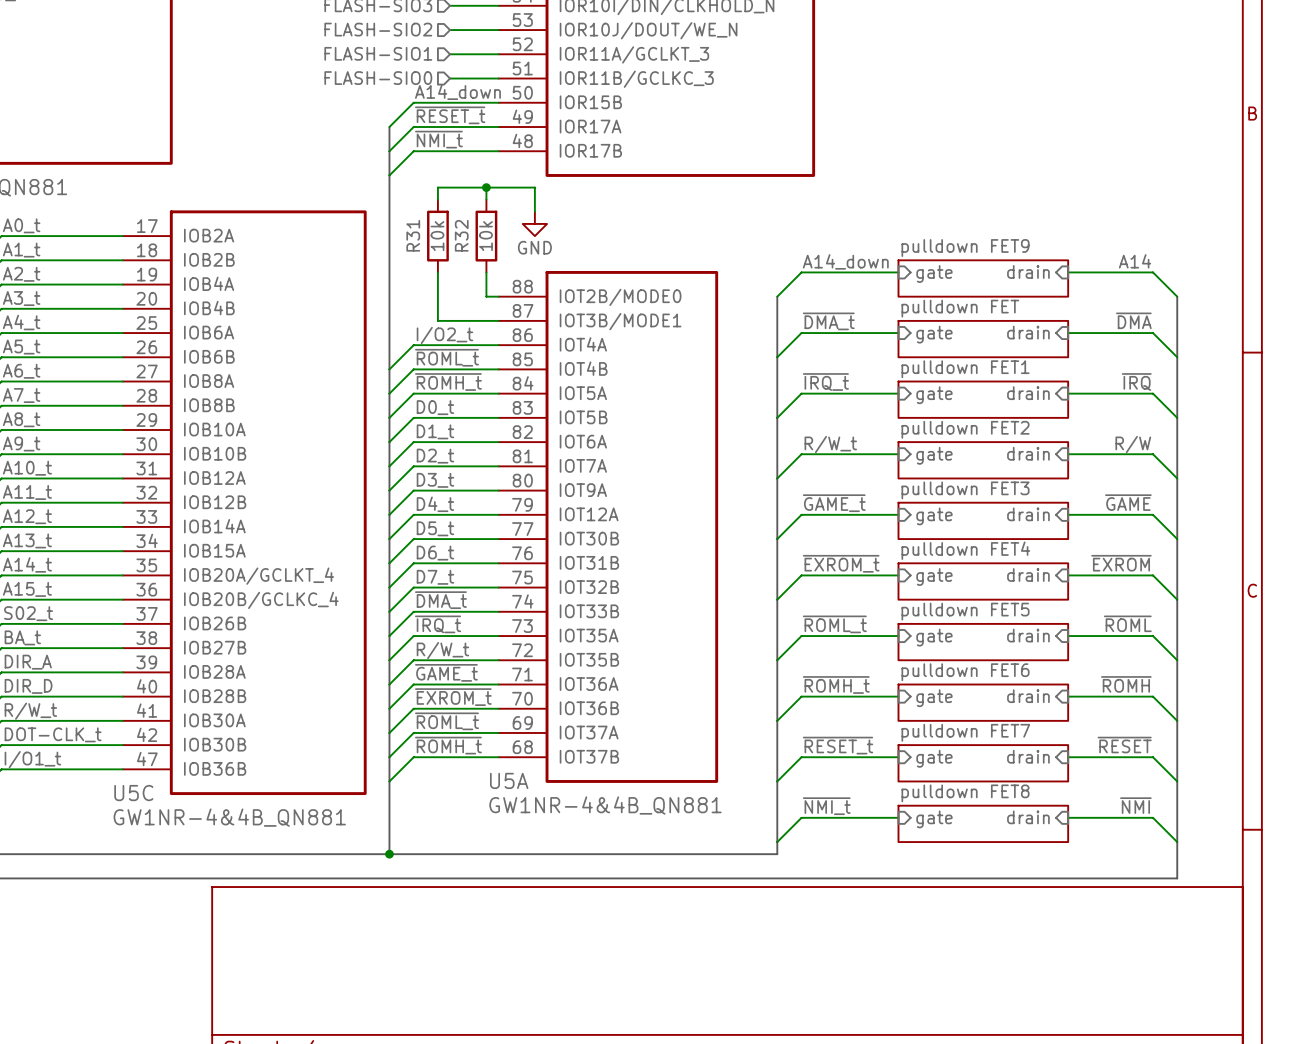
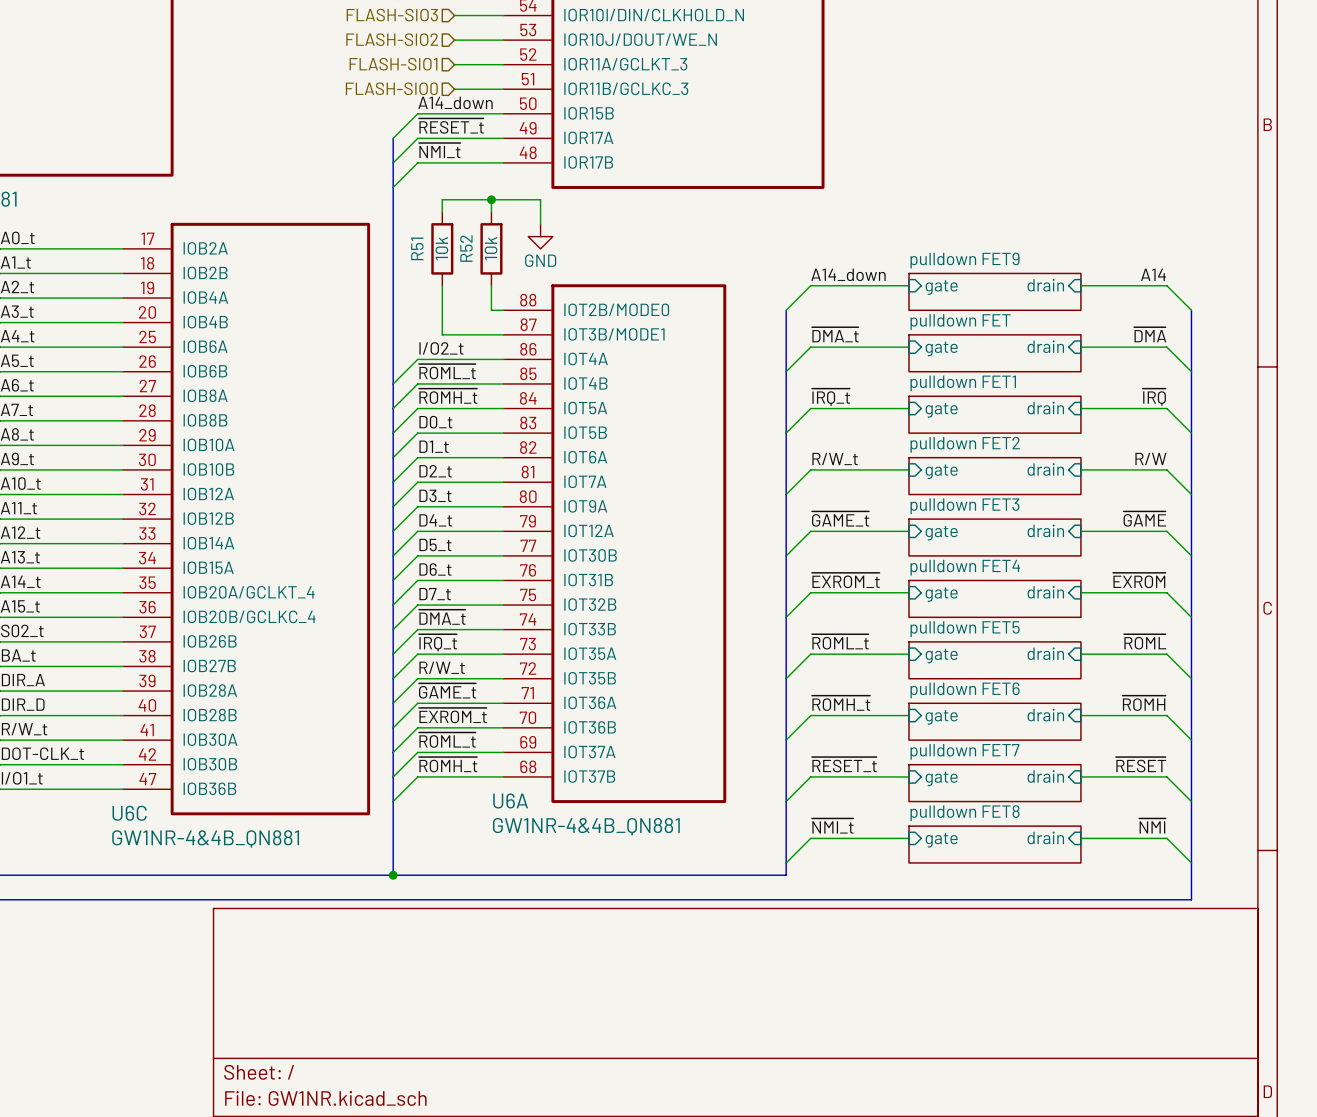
R31 name: R31 (413, 235) -> R51 (417, 248)
R32 name: R32 (461, 235) -> R52 (466, 248)
U5A name: U5A (509, 780) -> U6A (510, 800)
U5C name: U5C (133, 793) -> U6C (129, 813)

